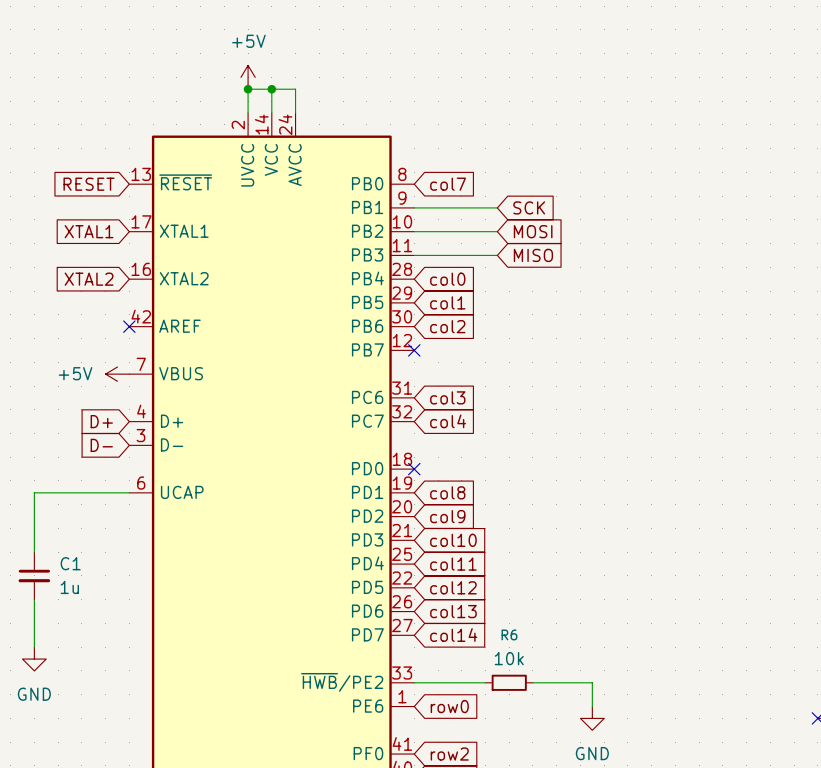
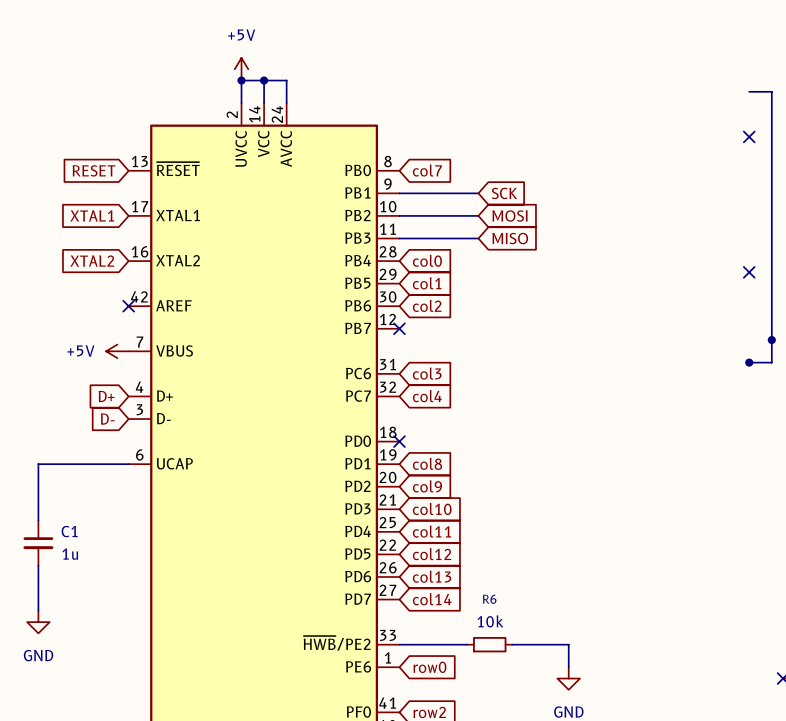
wire: none -> (749, 91) (771, 91) (771, 362) (749, 362)
no-connect mark: none -> (749, 136)
no-connect mark: none -> (749, 272)
junction: none -> (771, 340)
junction: none -> (749, 362)

